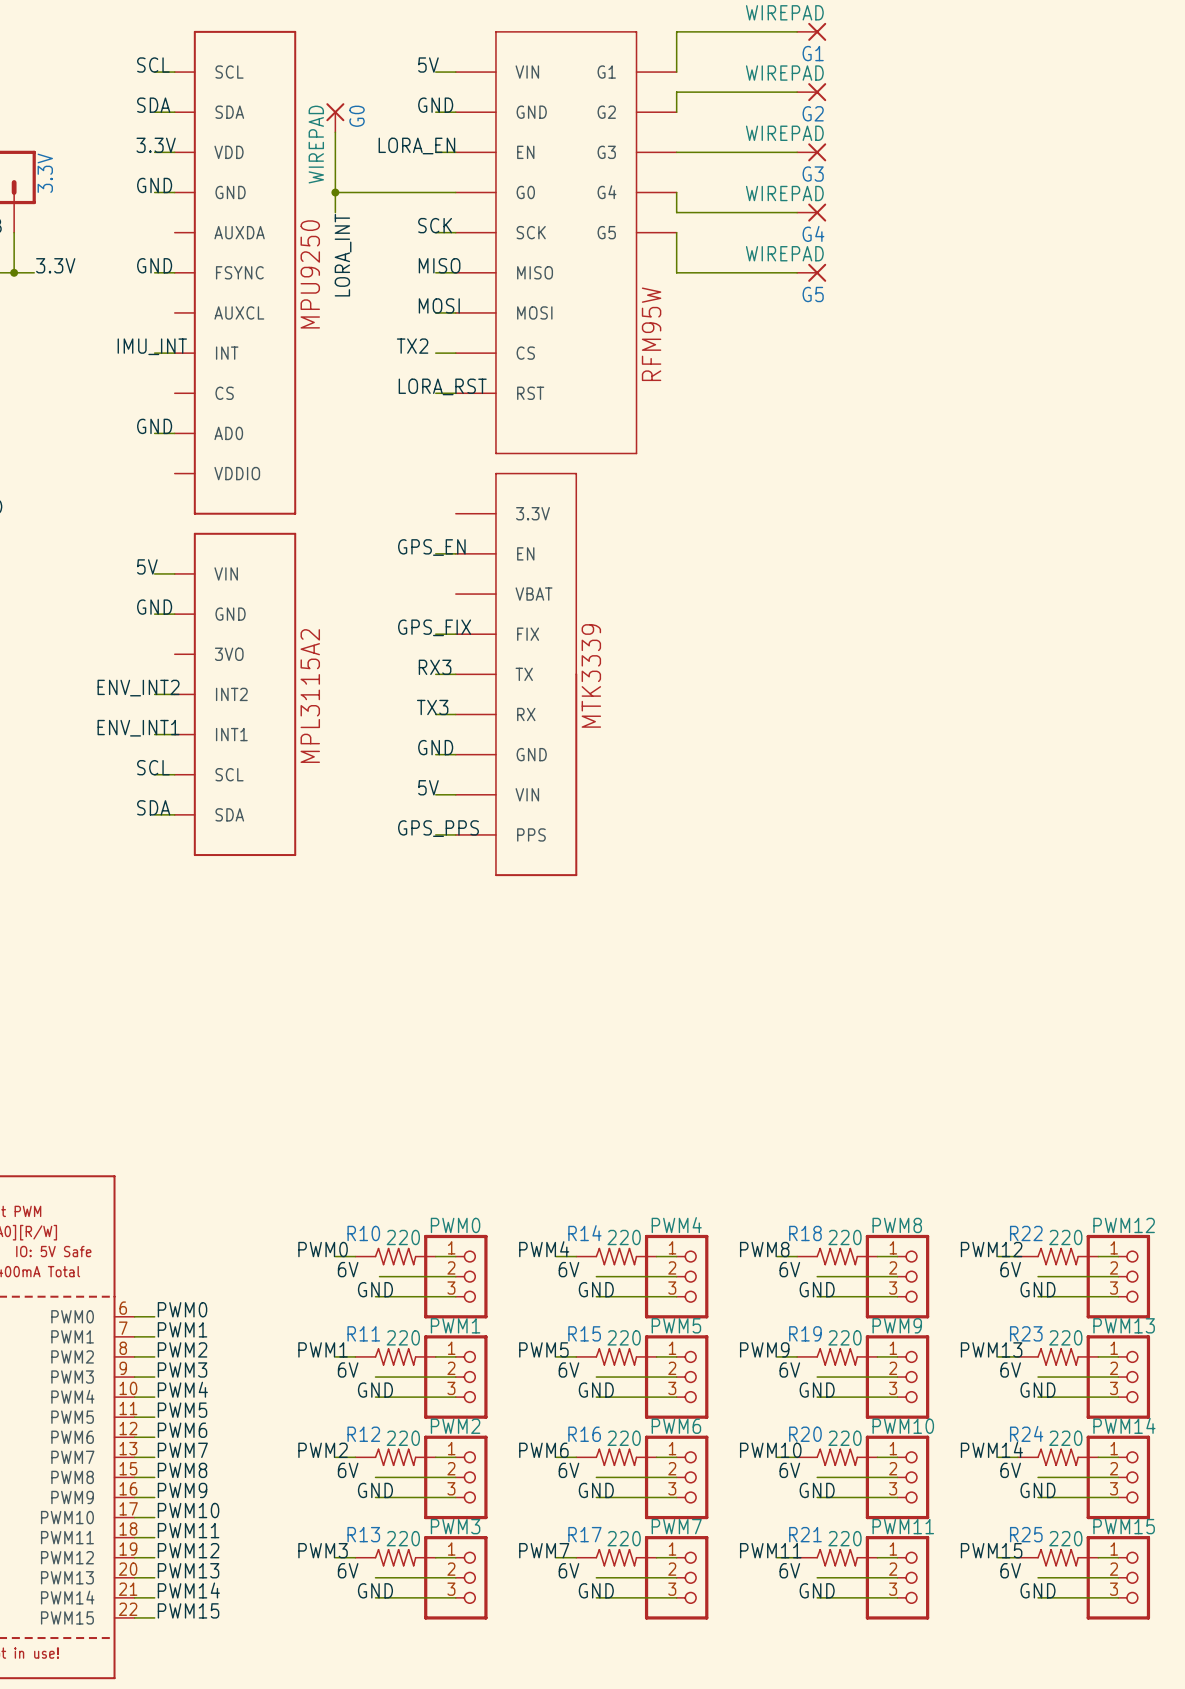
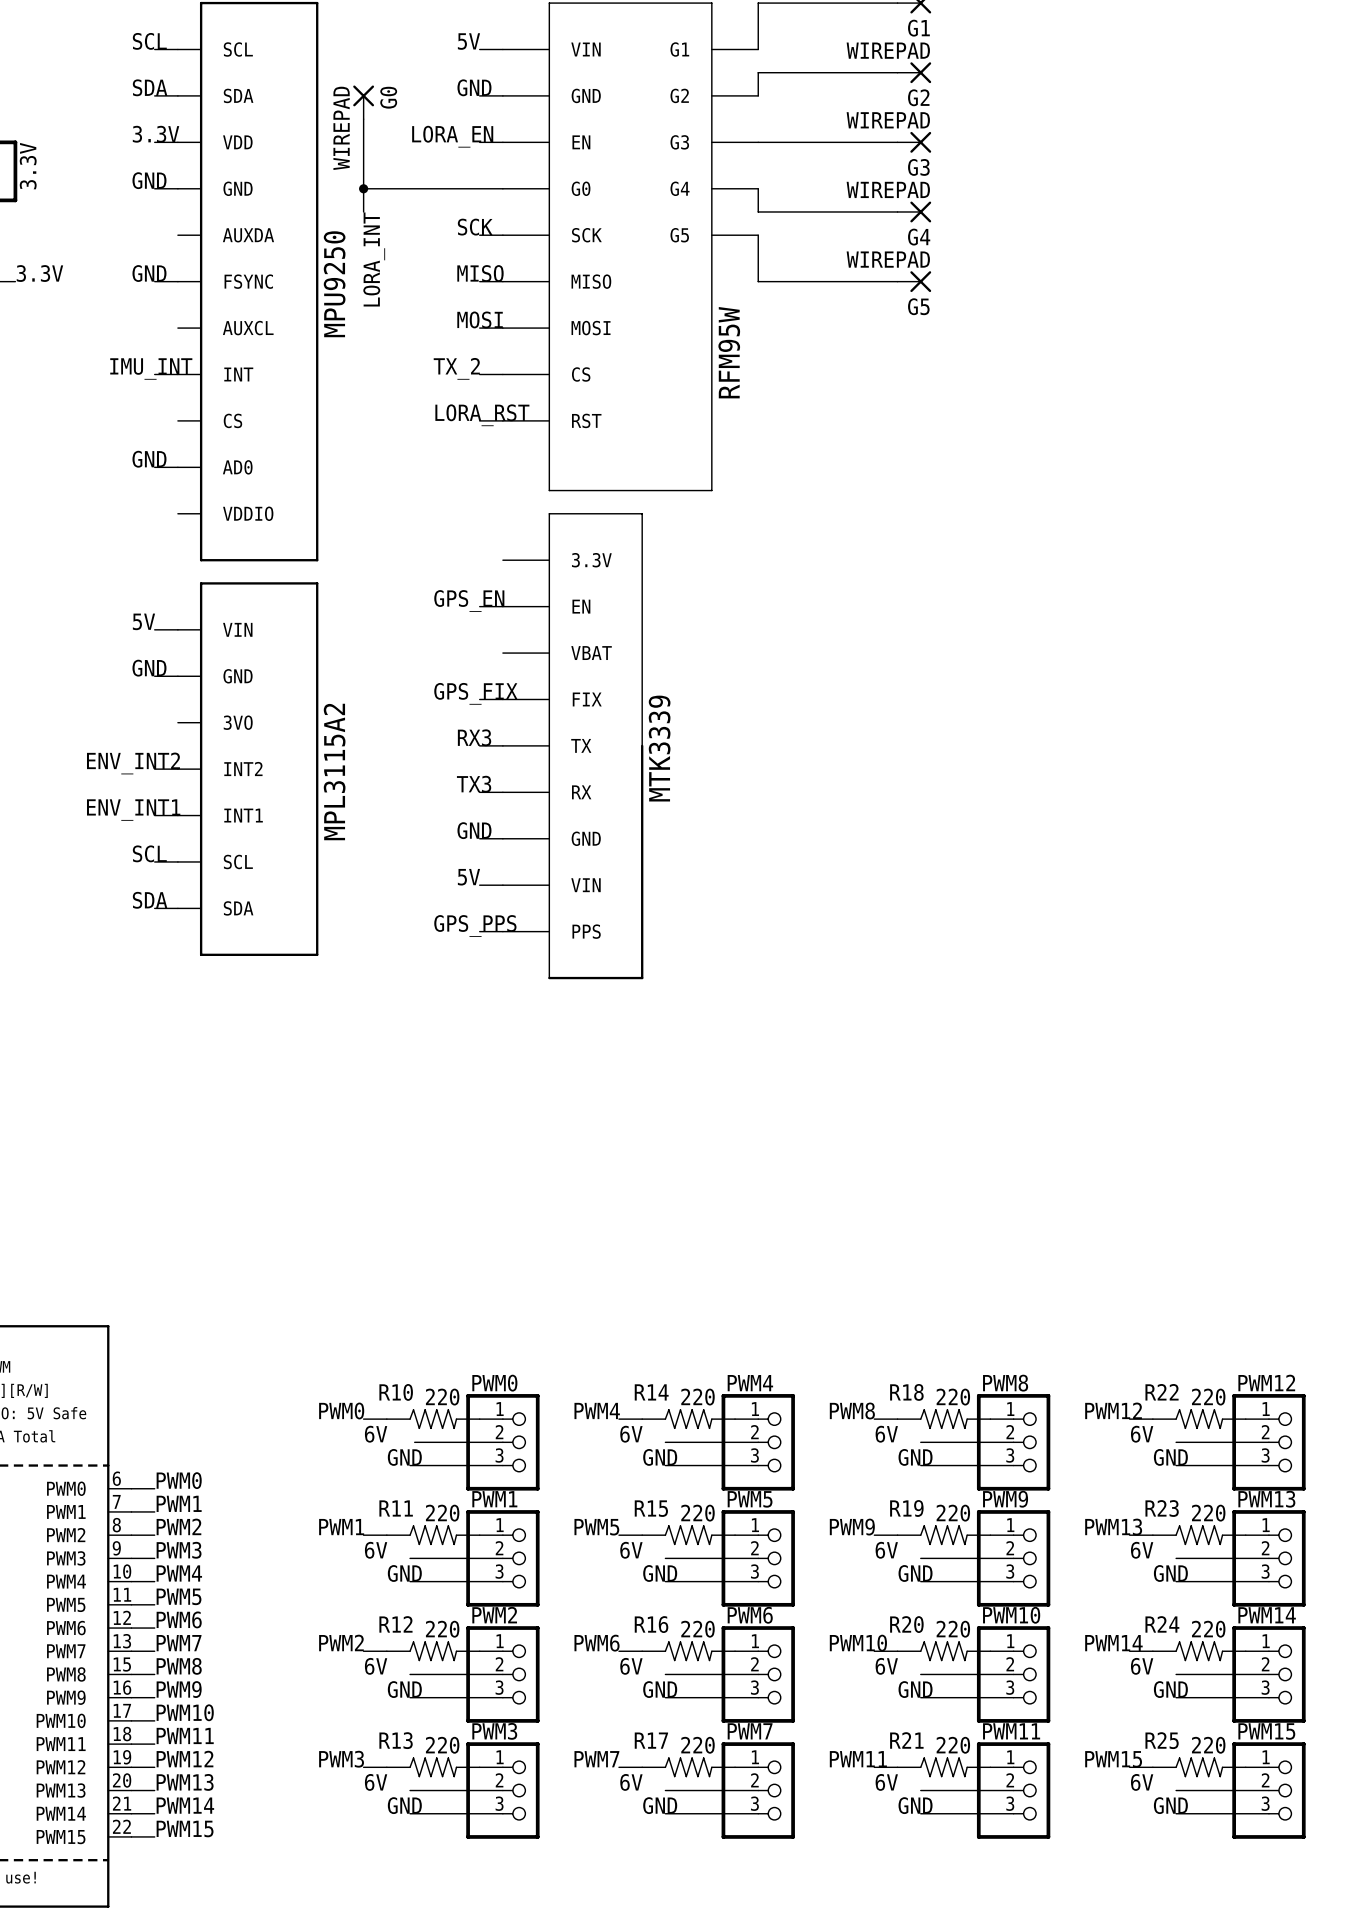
label: TX2 (412, 346) -> TX_2 (456, 368)

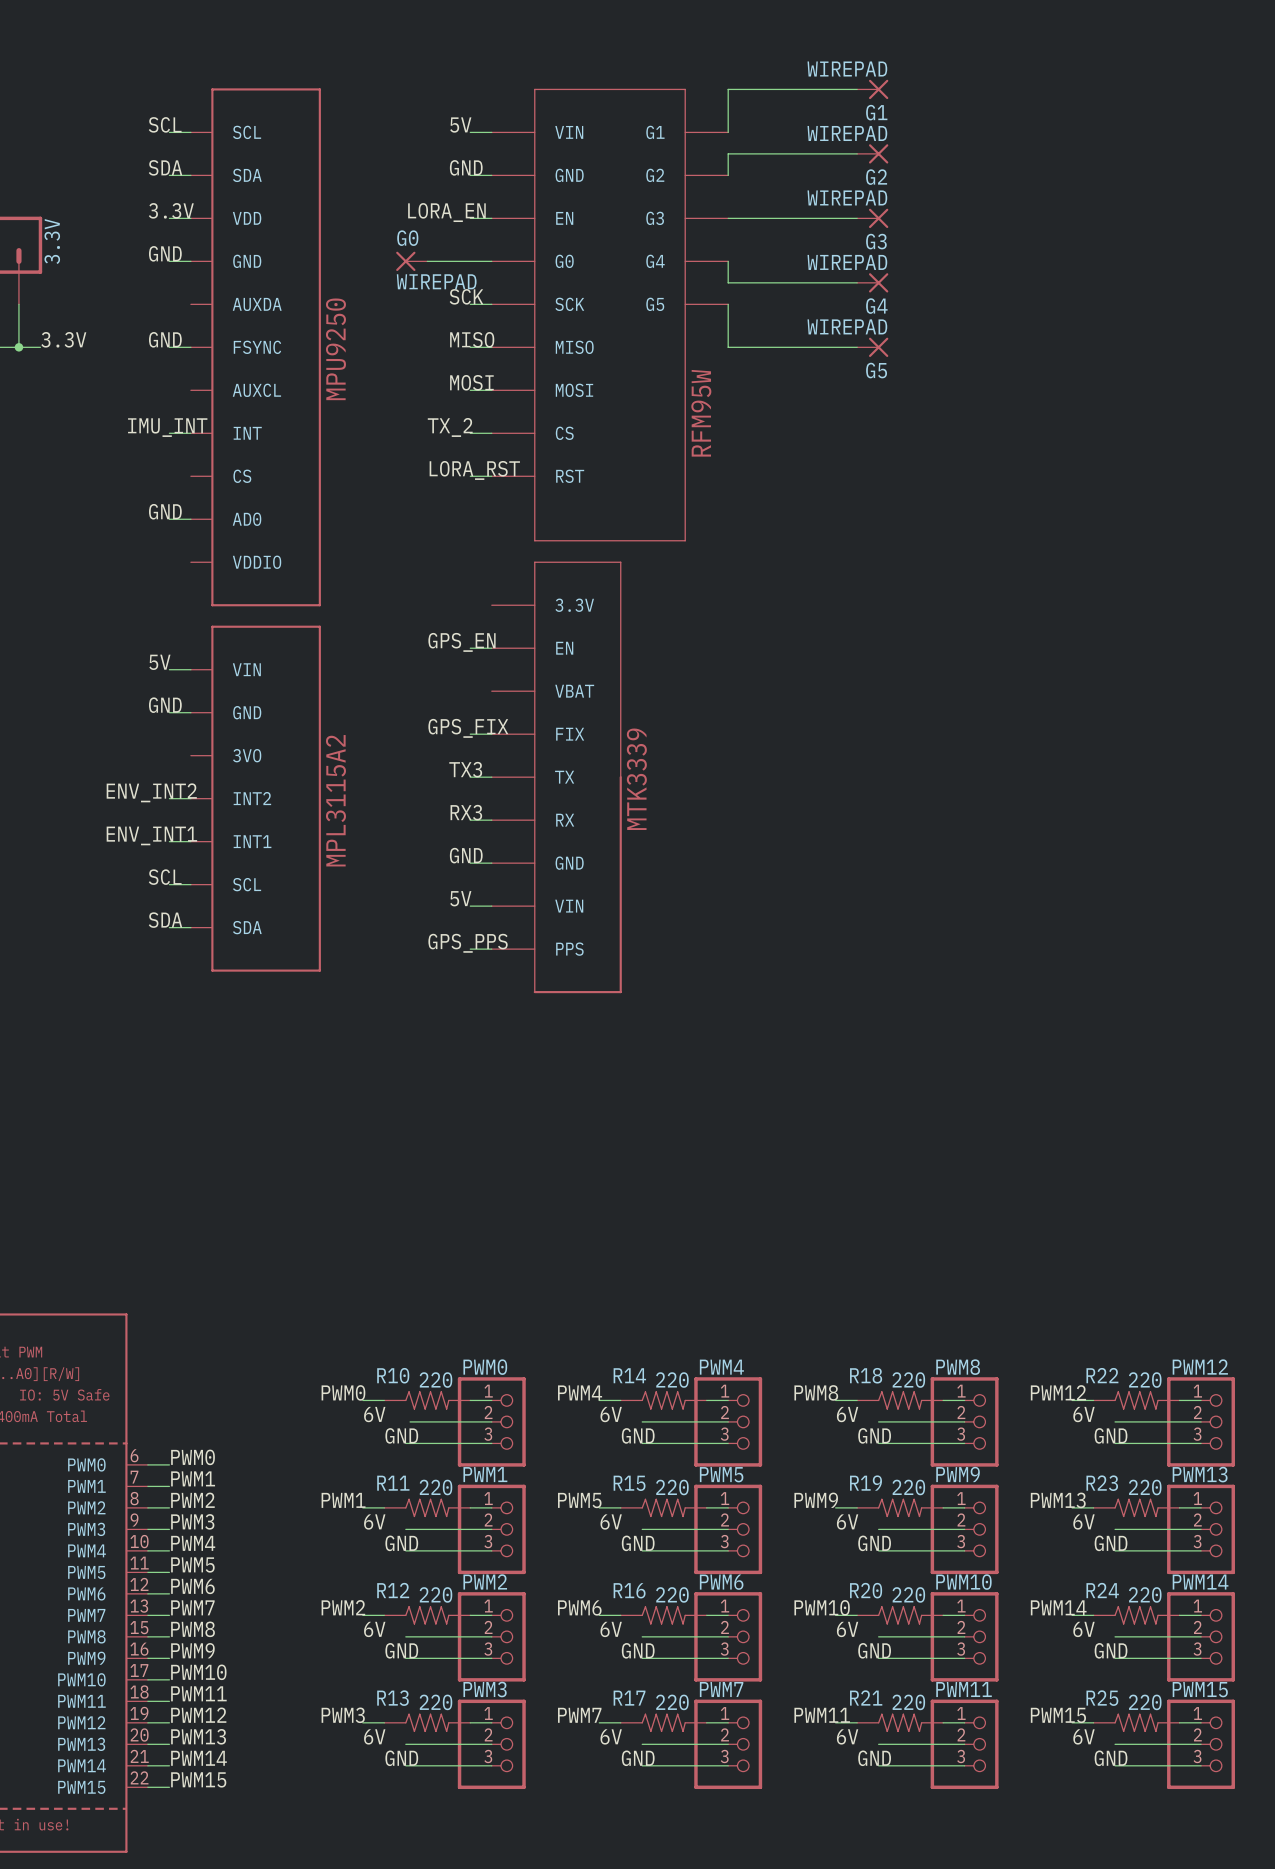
G0 rotation: 0° (363, 95) -> 90° counterclockwise (405, 261)
G0 position: (363, 102) -> (411, 261)
wire: (363, 119) (363, 211) -> none
wire: (363, 188) (433, 188) -> none
junction: (363, 188) -> none
label: LORA_INT (374, 259) -> none
label: RX3 (474, 737) -> TX3 (465, 769)
label: TX3 (474, 784) -> RX3 (466, 812)

